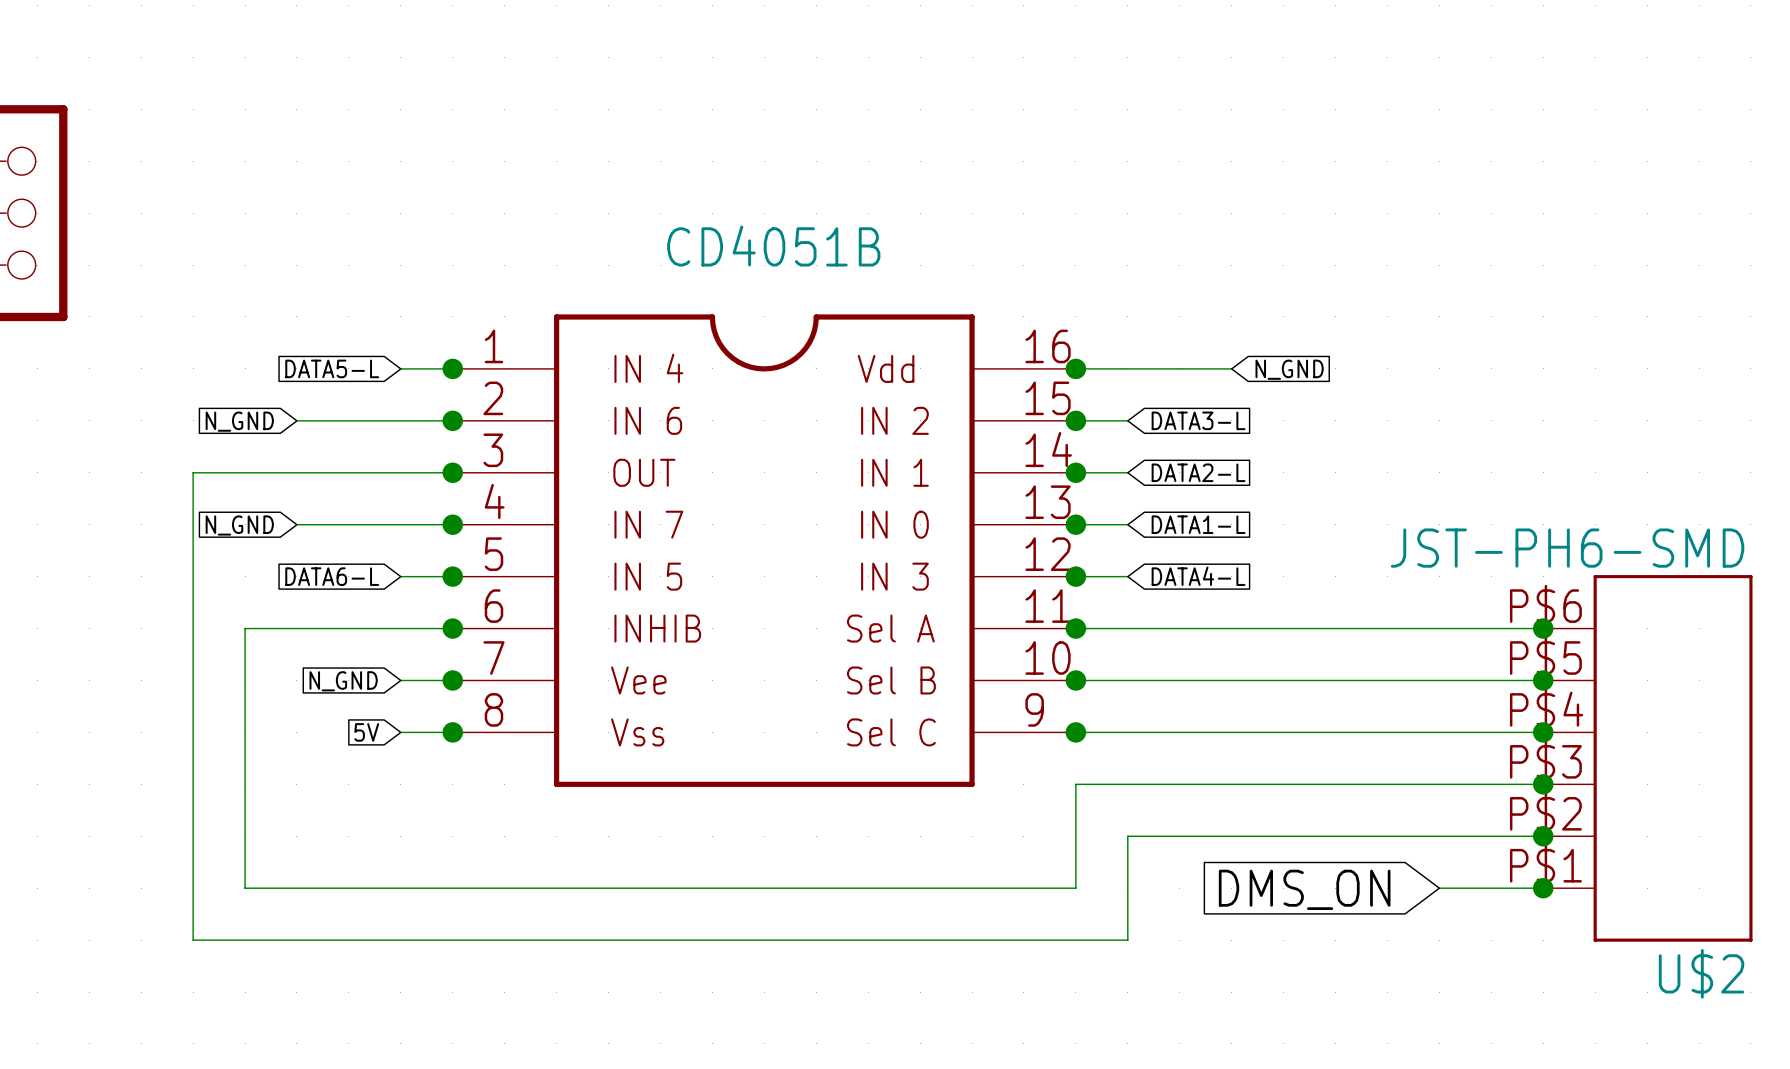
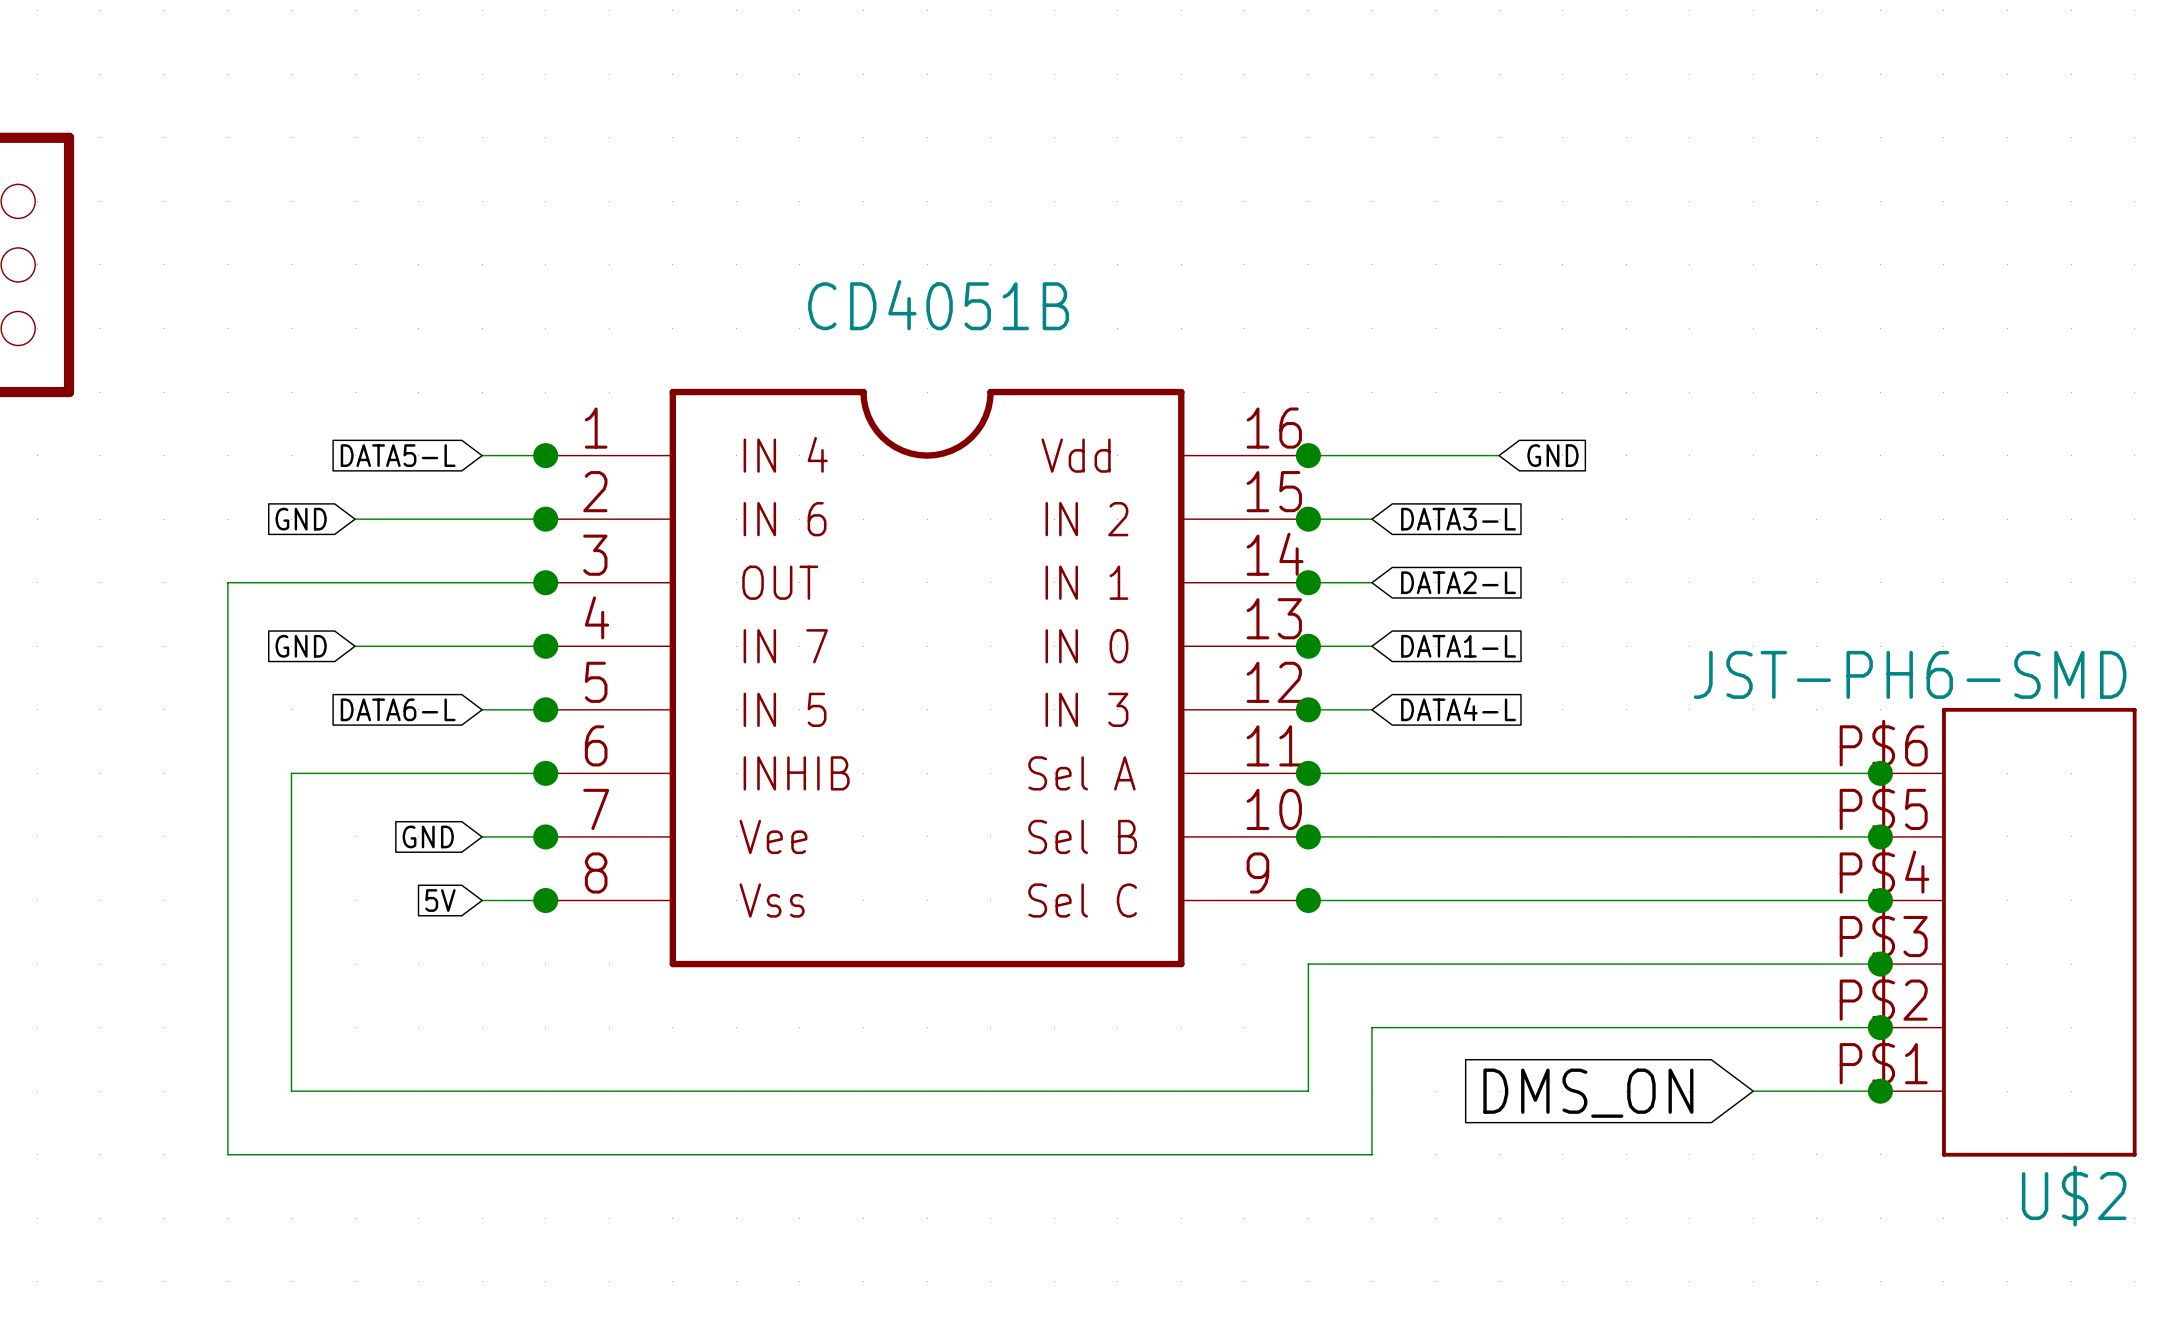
global label: N_GND (1289, 369) -> GND (1552, 455)
global label: N_GND (239, 421) -> GND (301, 519)
global label: N_GND (239, 525) -> GND (301, 646)
global label: N_GND (343, 681) -> GND (428, 836)

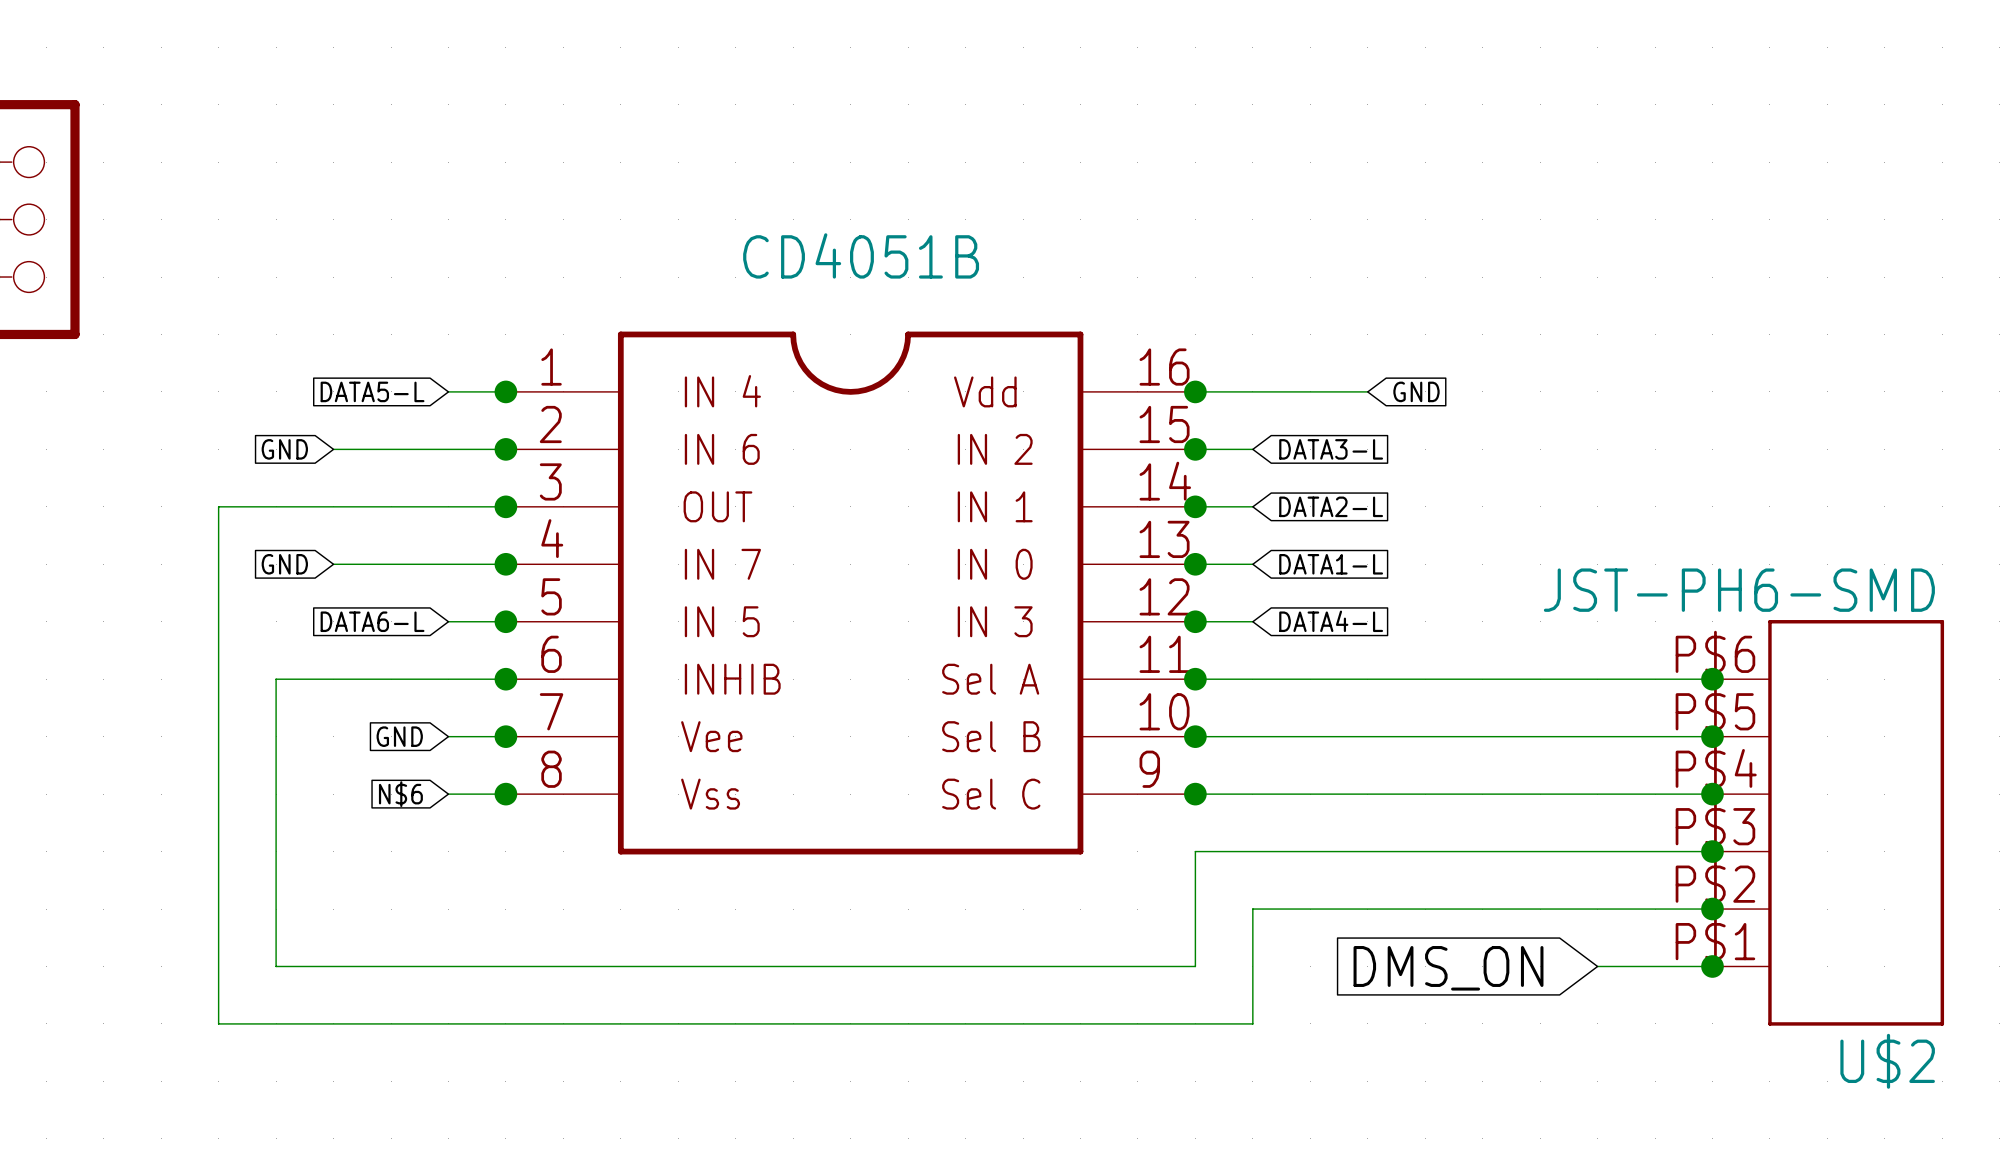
global label: 5V (440, 900) -> N$6 (400, 794)

